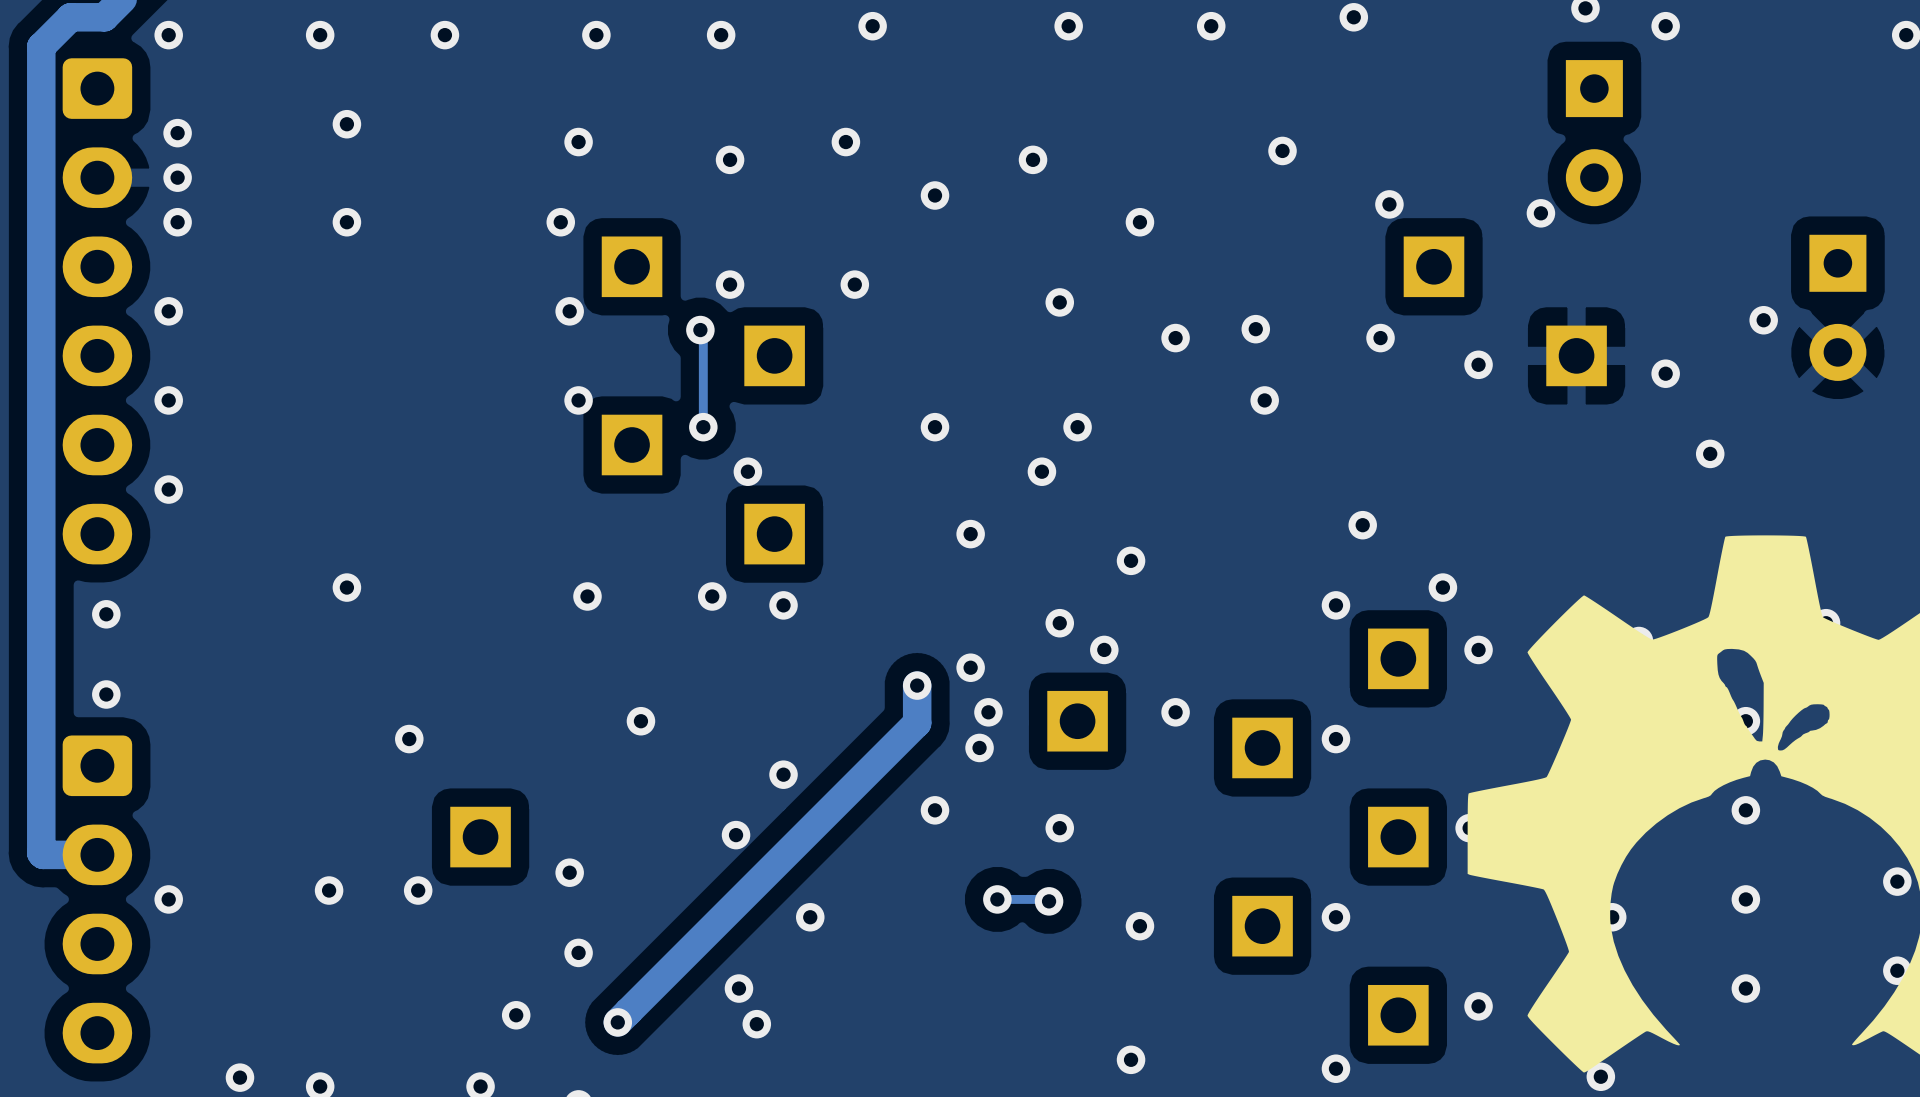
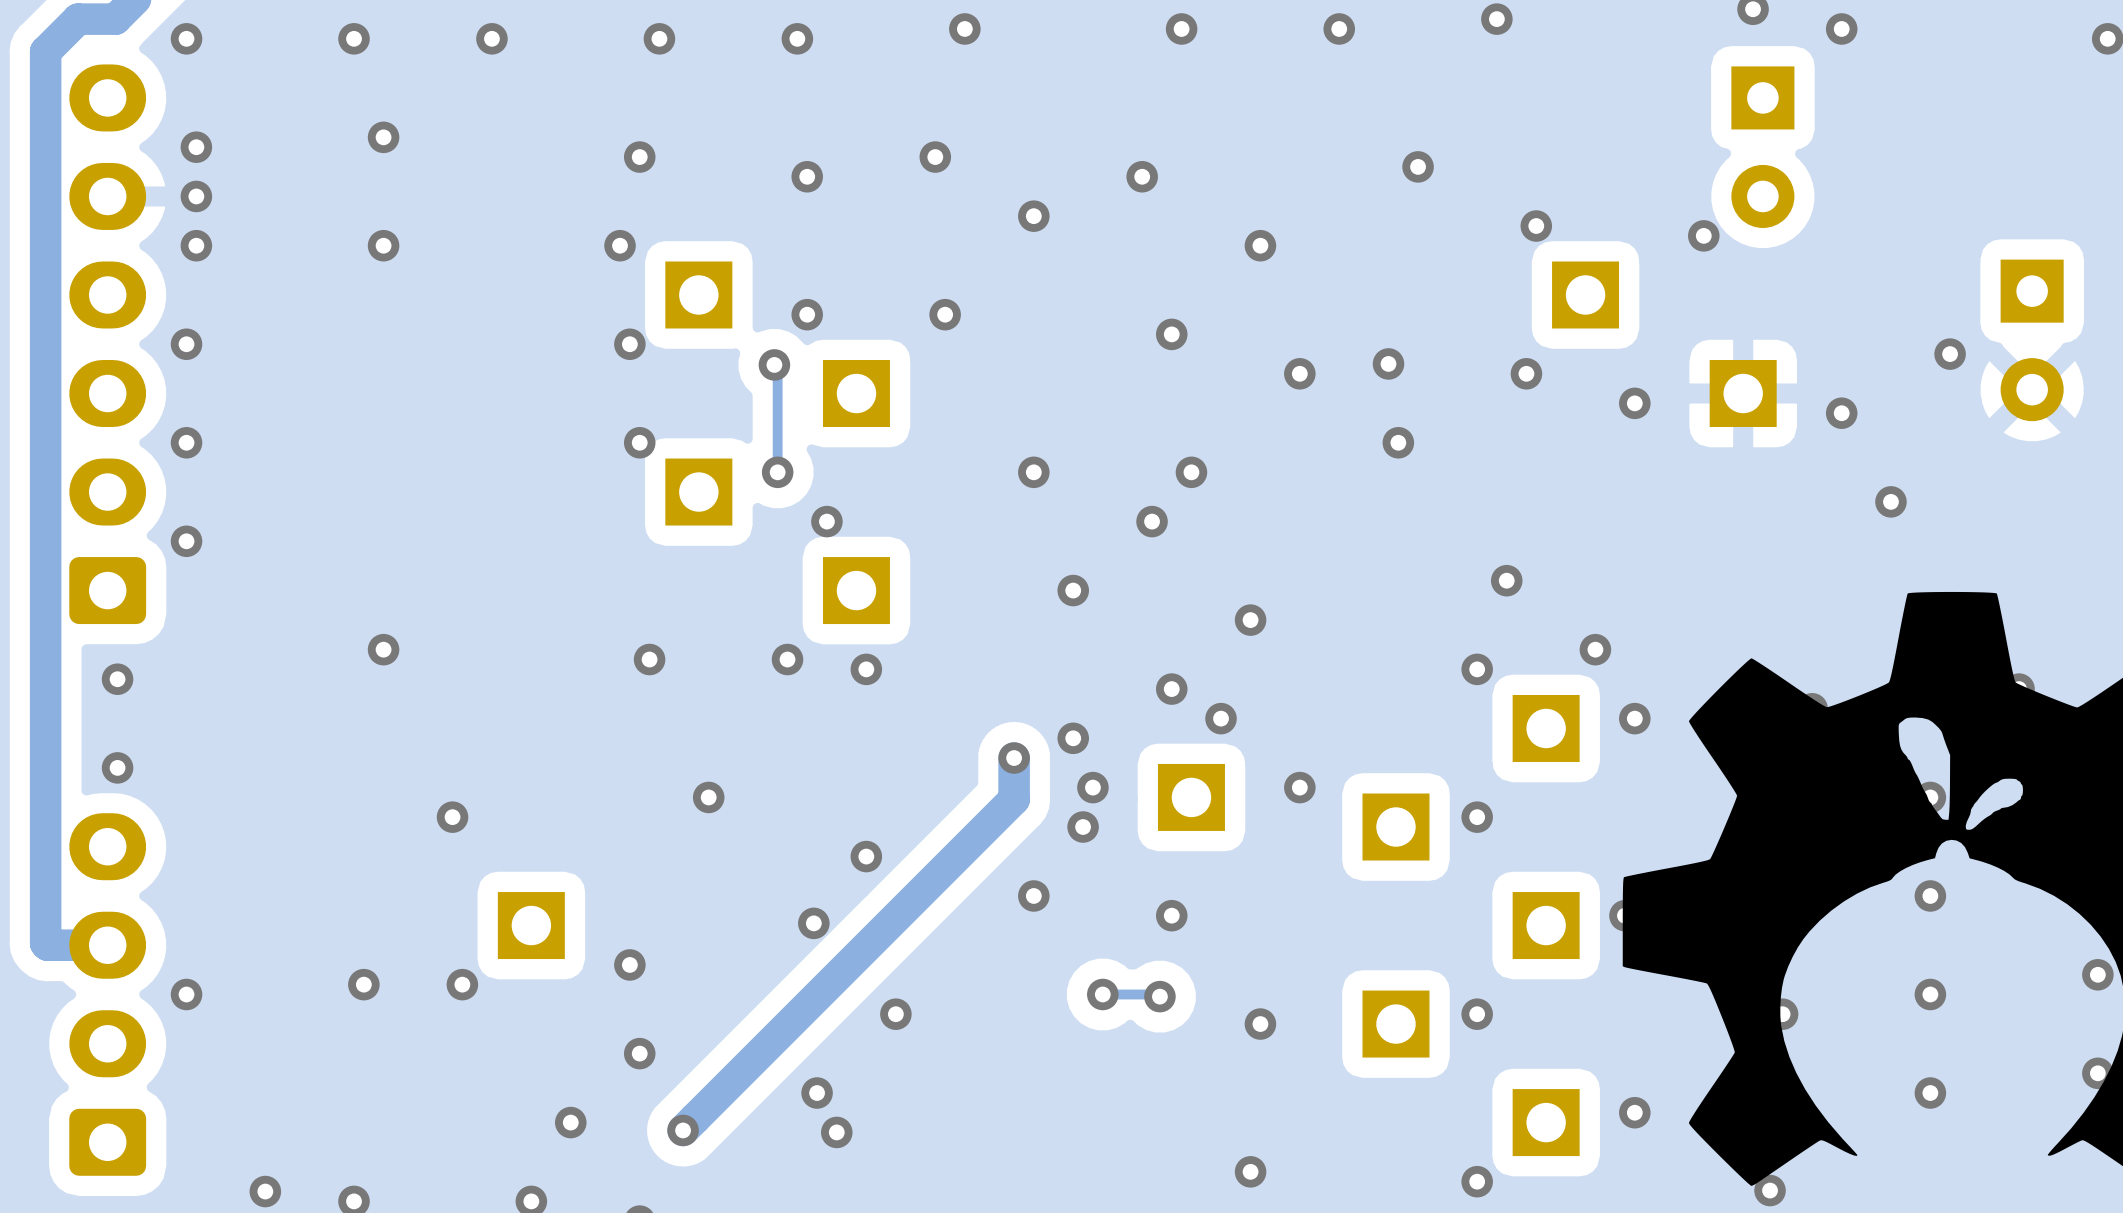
part rotation: 0° (97, 311) -> 180° (107, 344)
part rotation: 0° (97, 899) -> 180° (107, 994)

